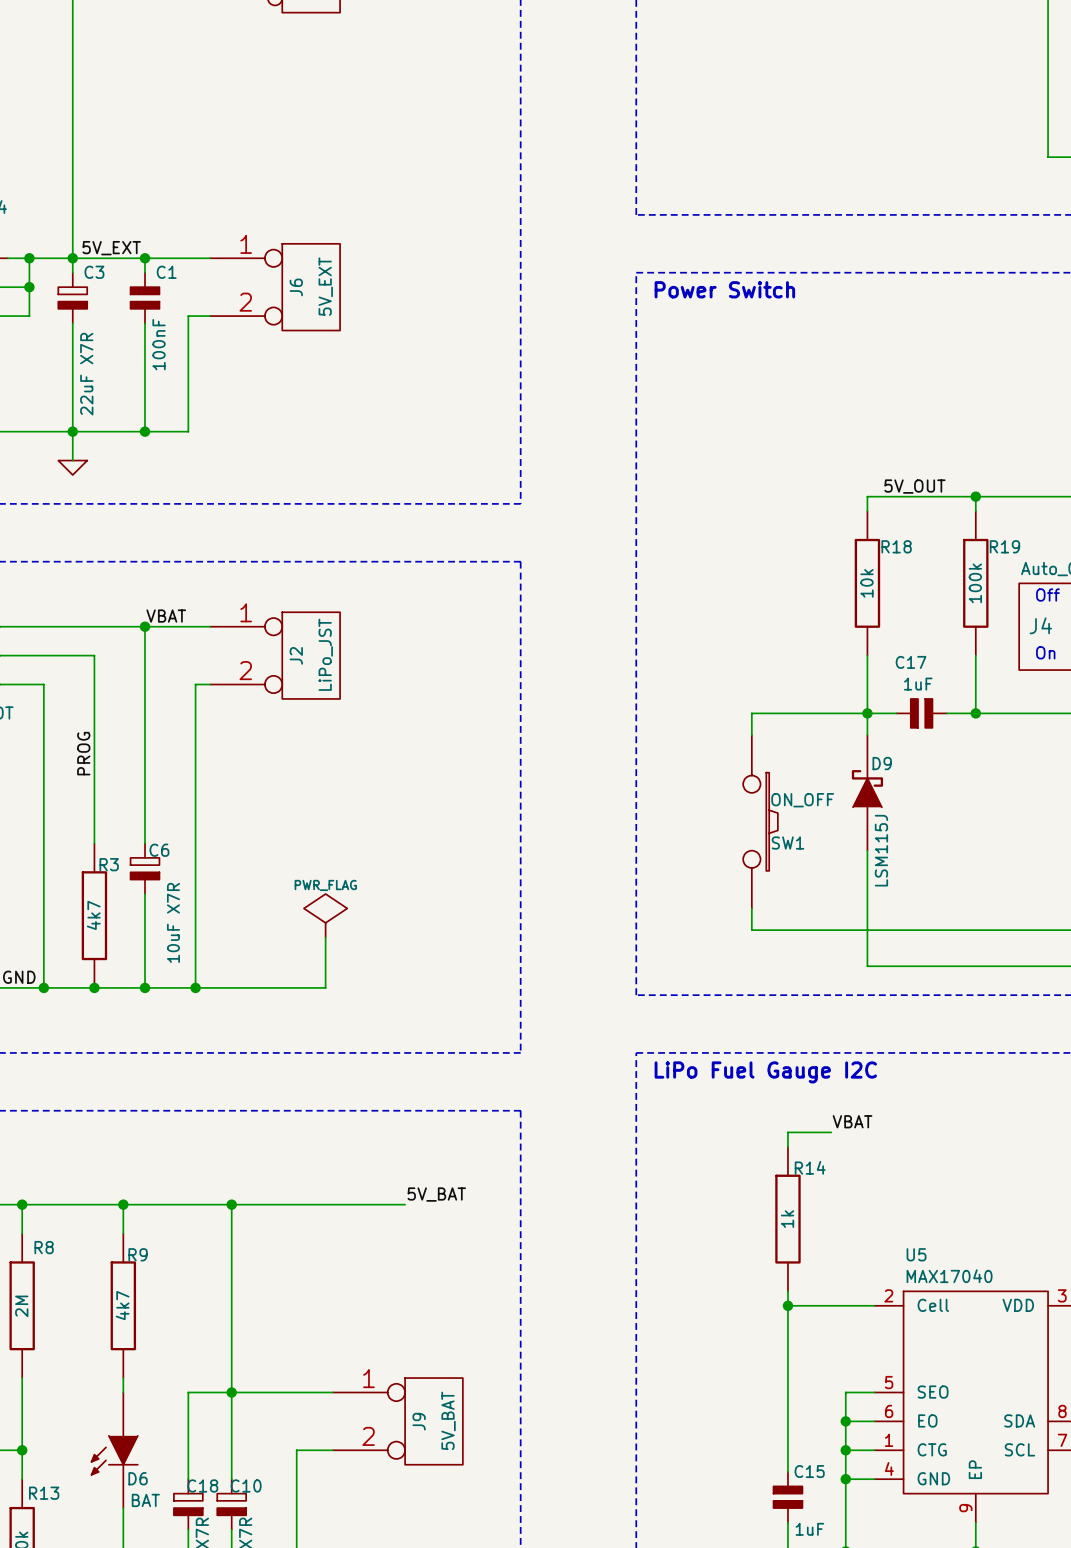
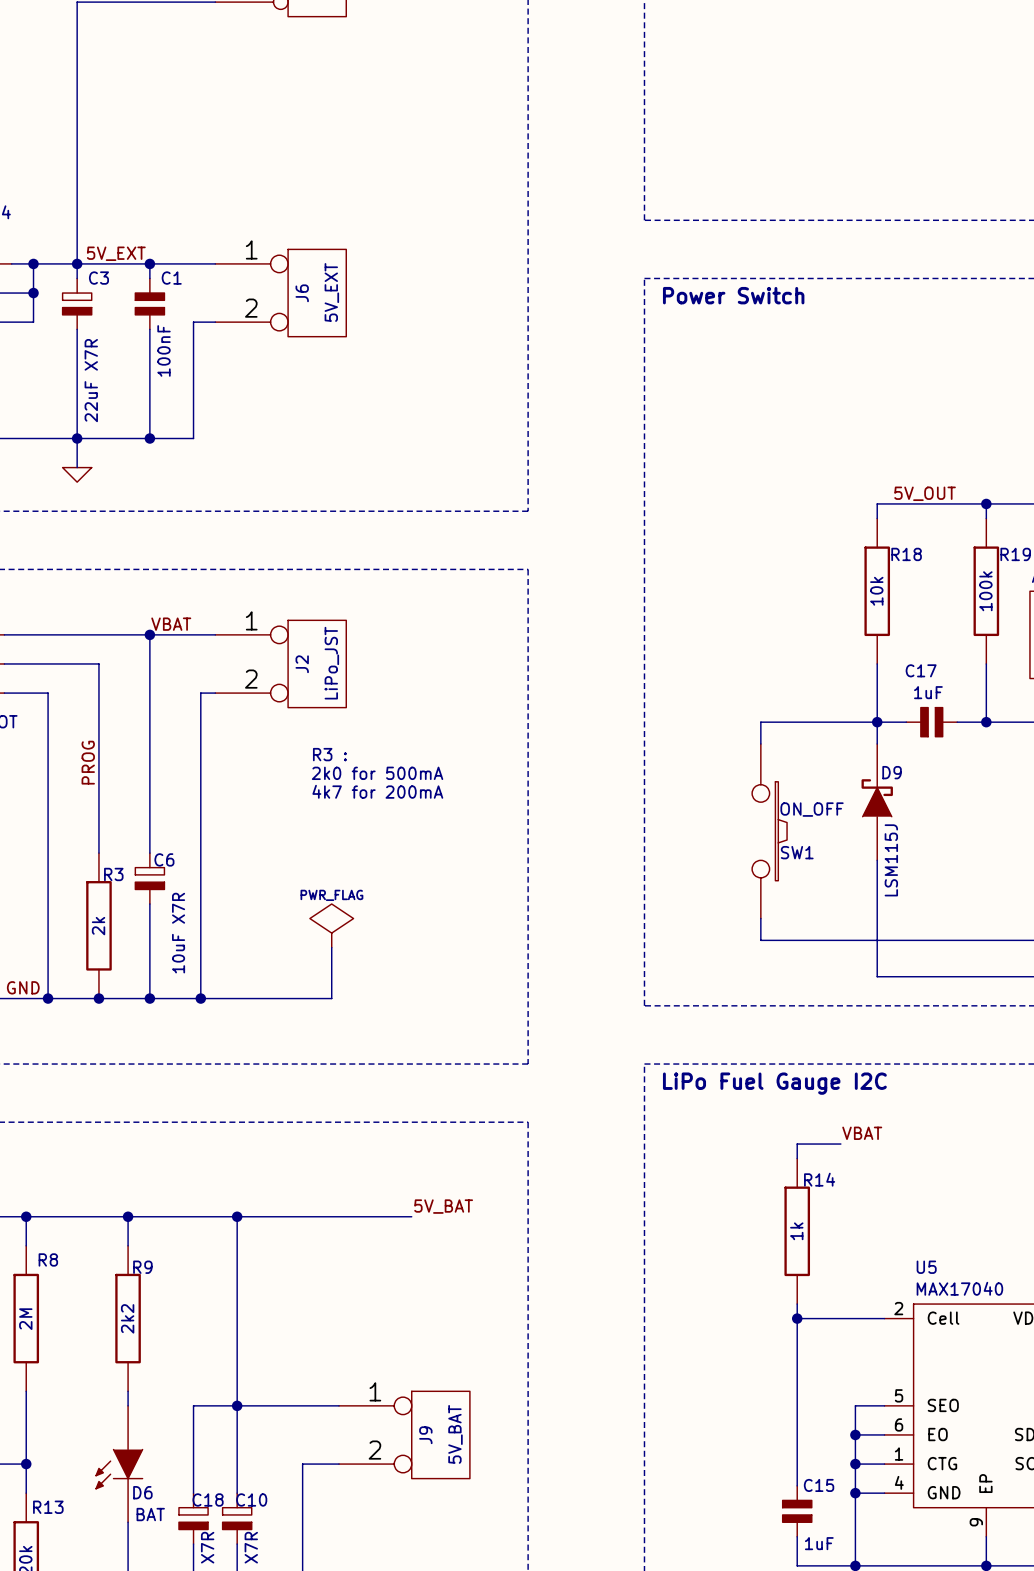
text: none -> R3 : (329, 754)
text: none -> 2k0 for 500mA (377, 773)
text: none -> 4k7 for 200mA (377, 791)
R3 value: 4k7 (93, 915) -> 2k (98, 926)
R9 value: 4k7 (122, 1305) -> 2k2 (127, 1318)

